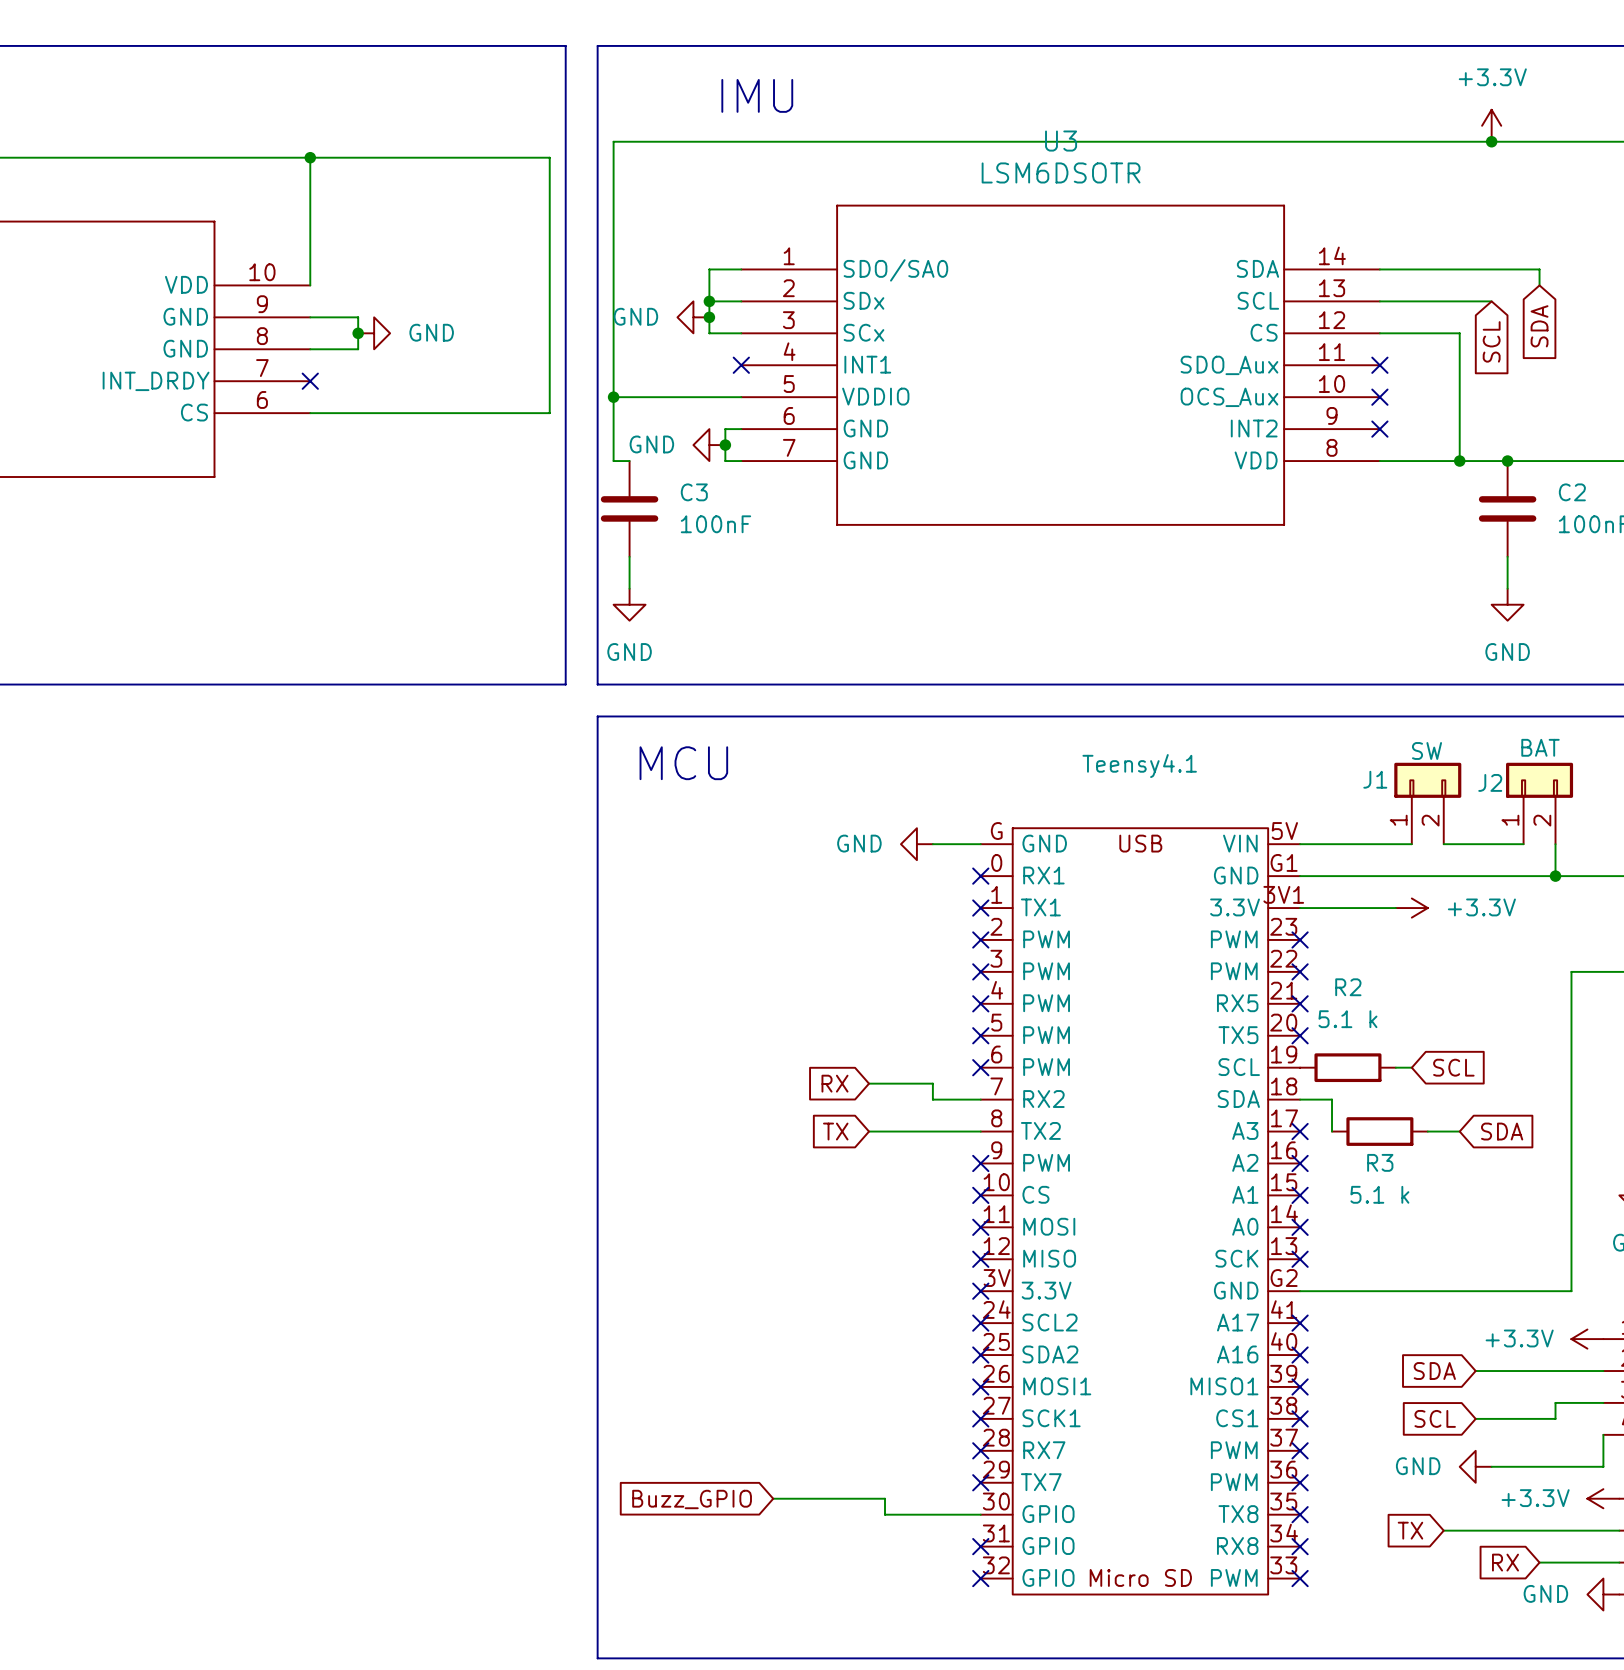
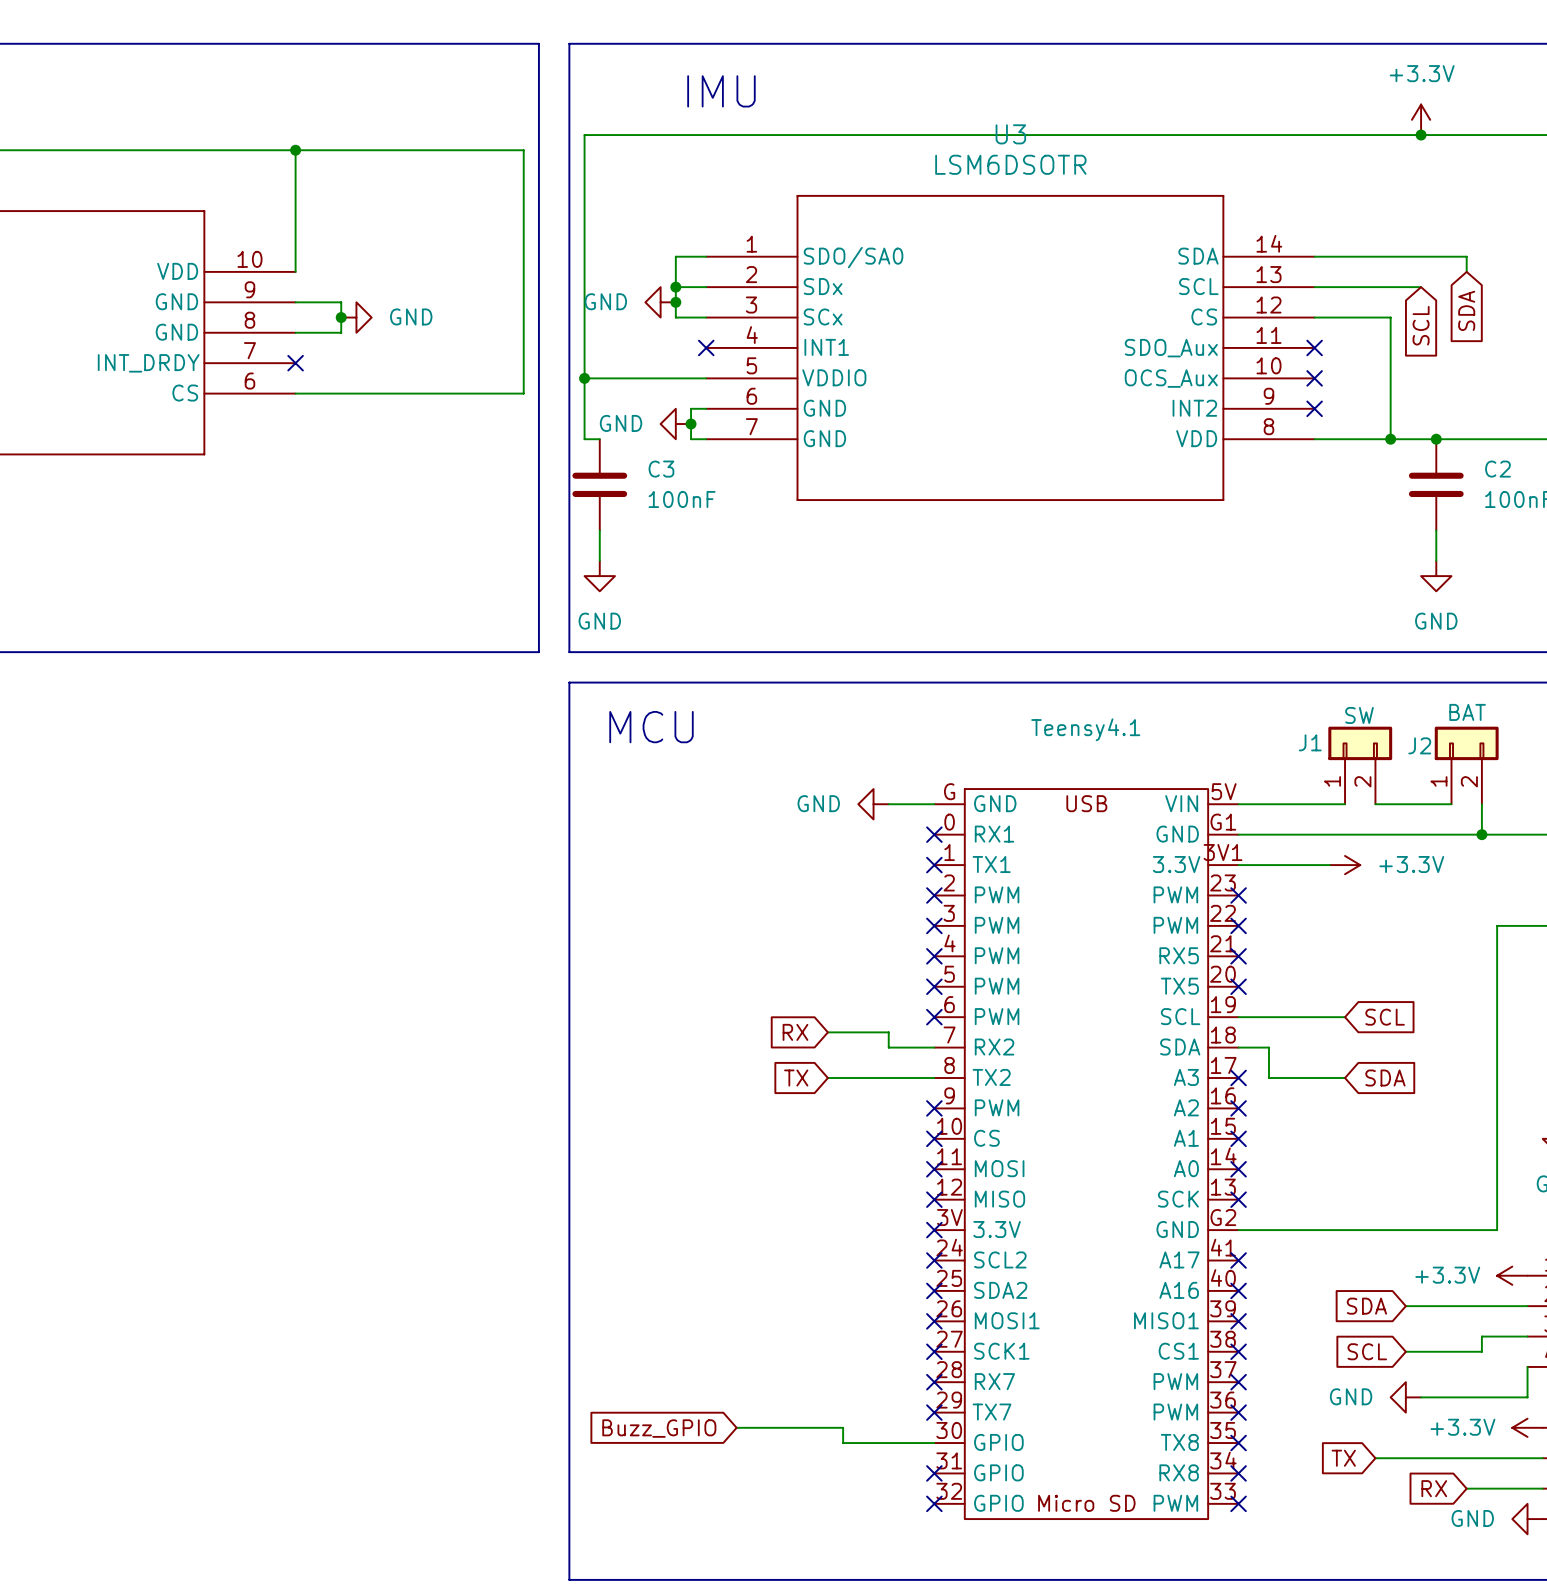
wire: none -> (1238, 1017) (1329, 1017)
R2: 5.1 k (1347, 1067) -> none
wire: none -> (1268, 1078) (1345, 1078)
R3: 5.1 k (1379, 1131) -> none
wire: (1427, 1131) (1459, 1131) -> none
global label position: SDA (1502, 1131) -> SDA (1385, 1078)

